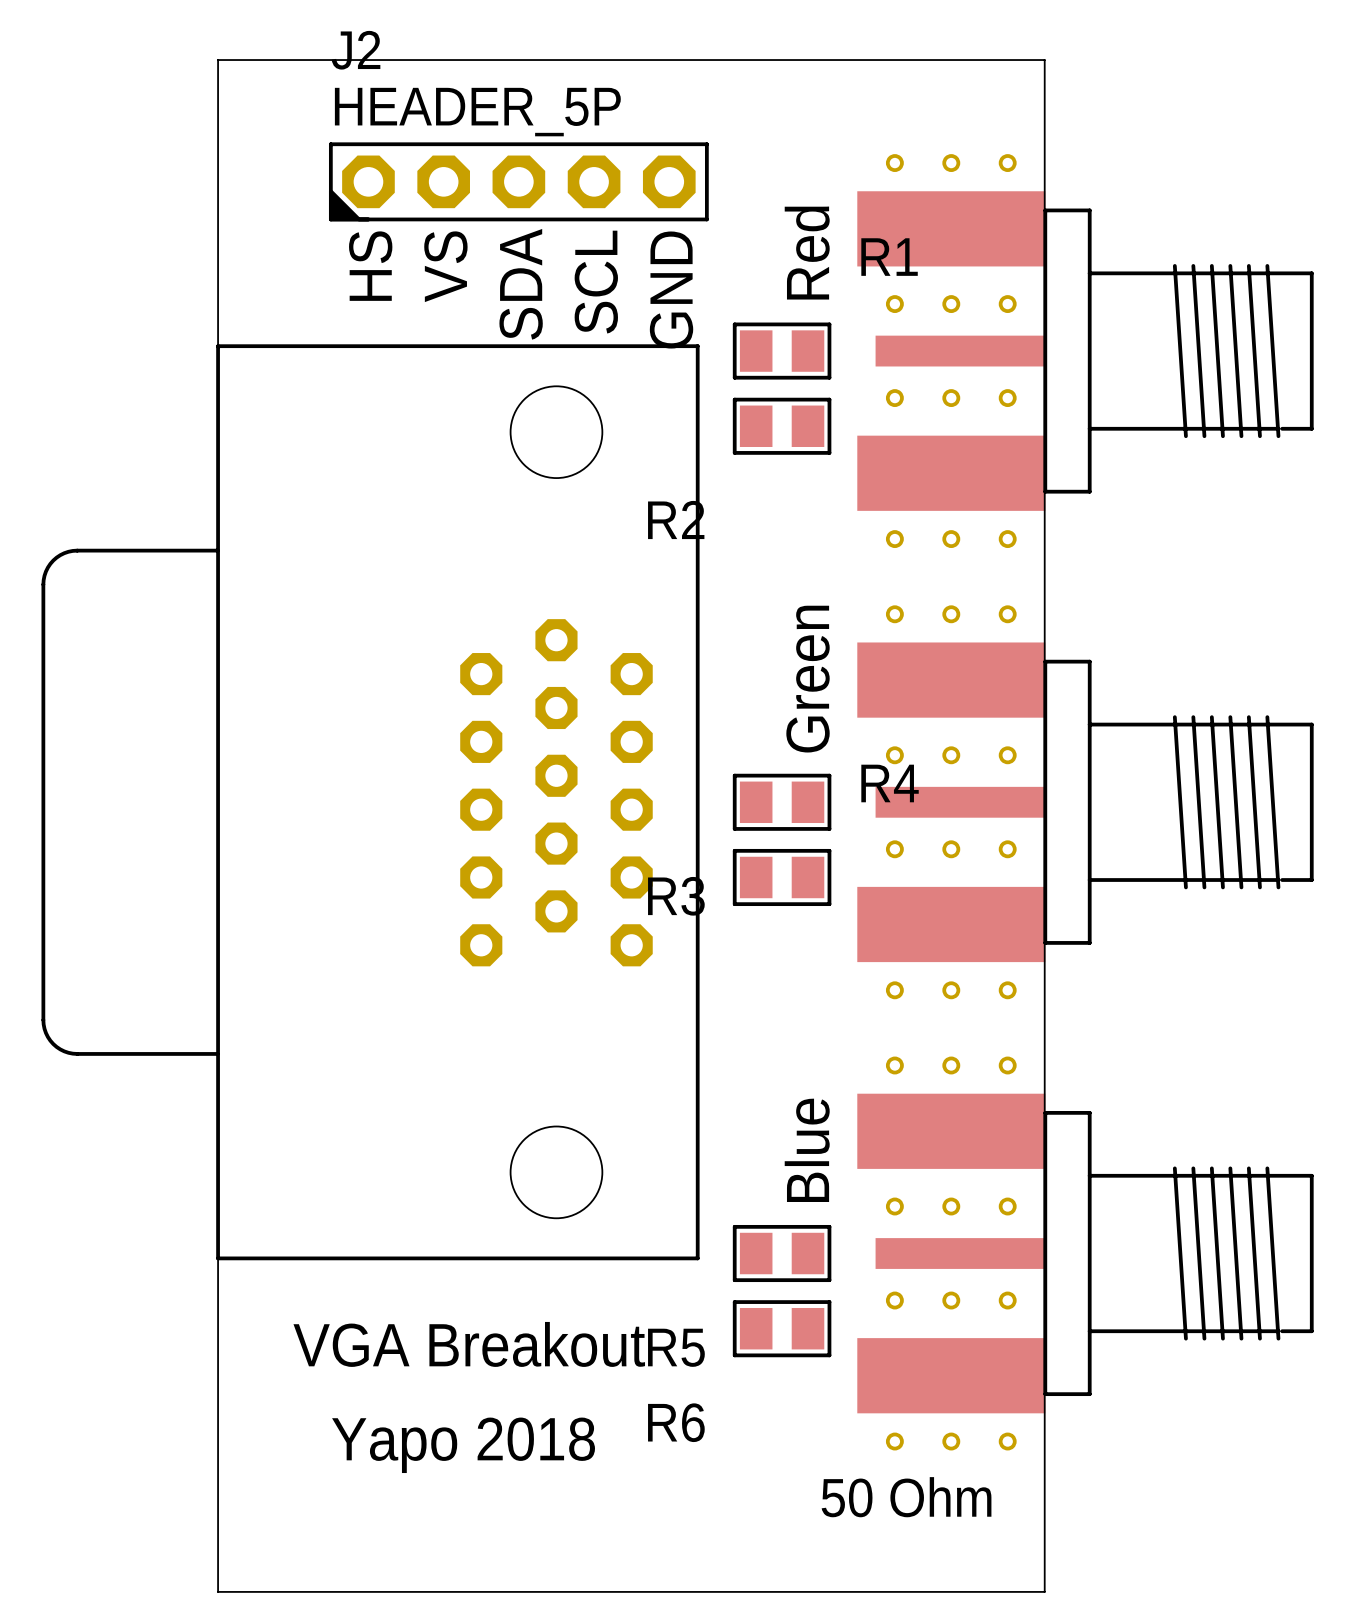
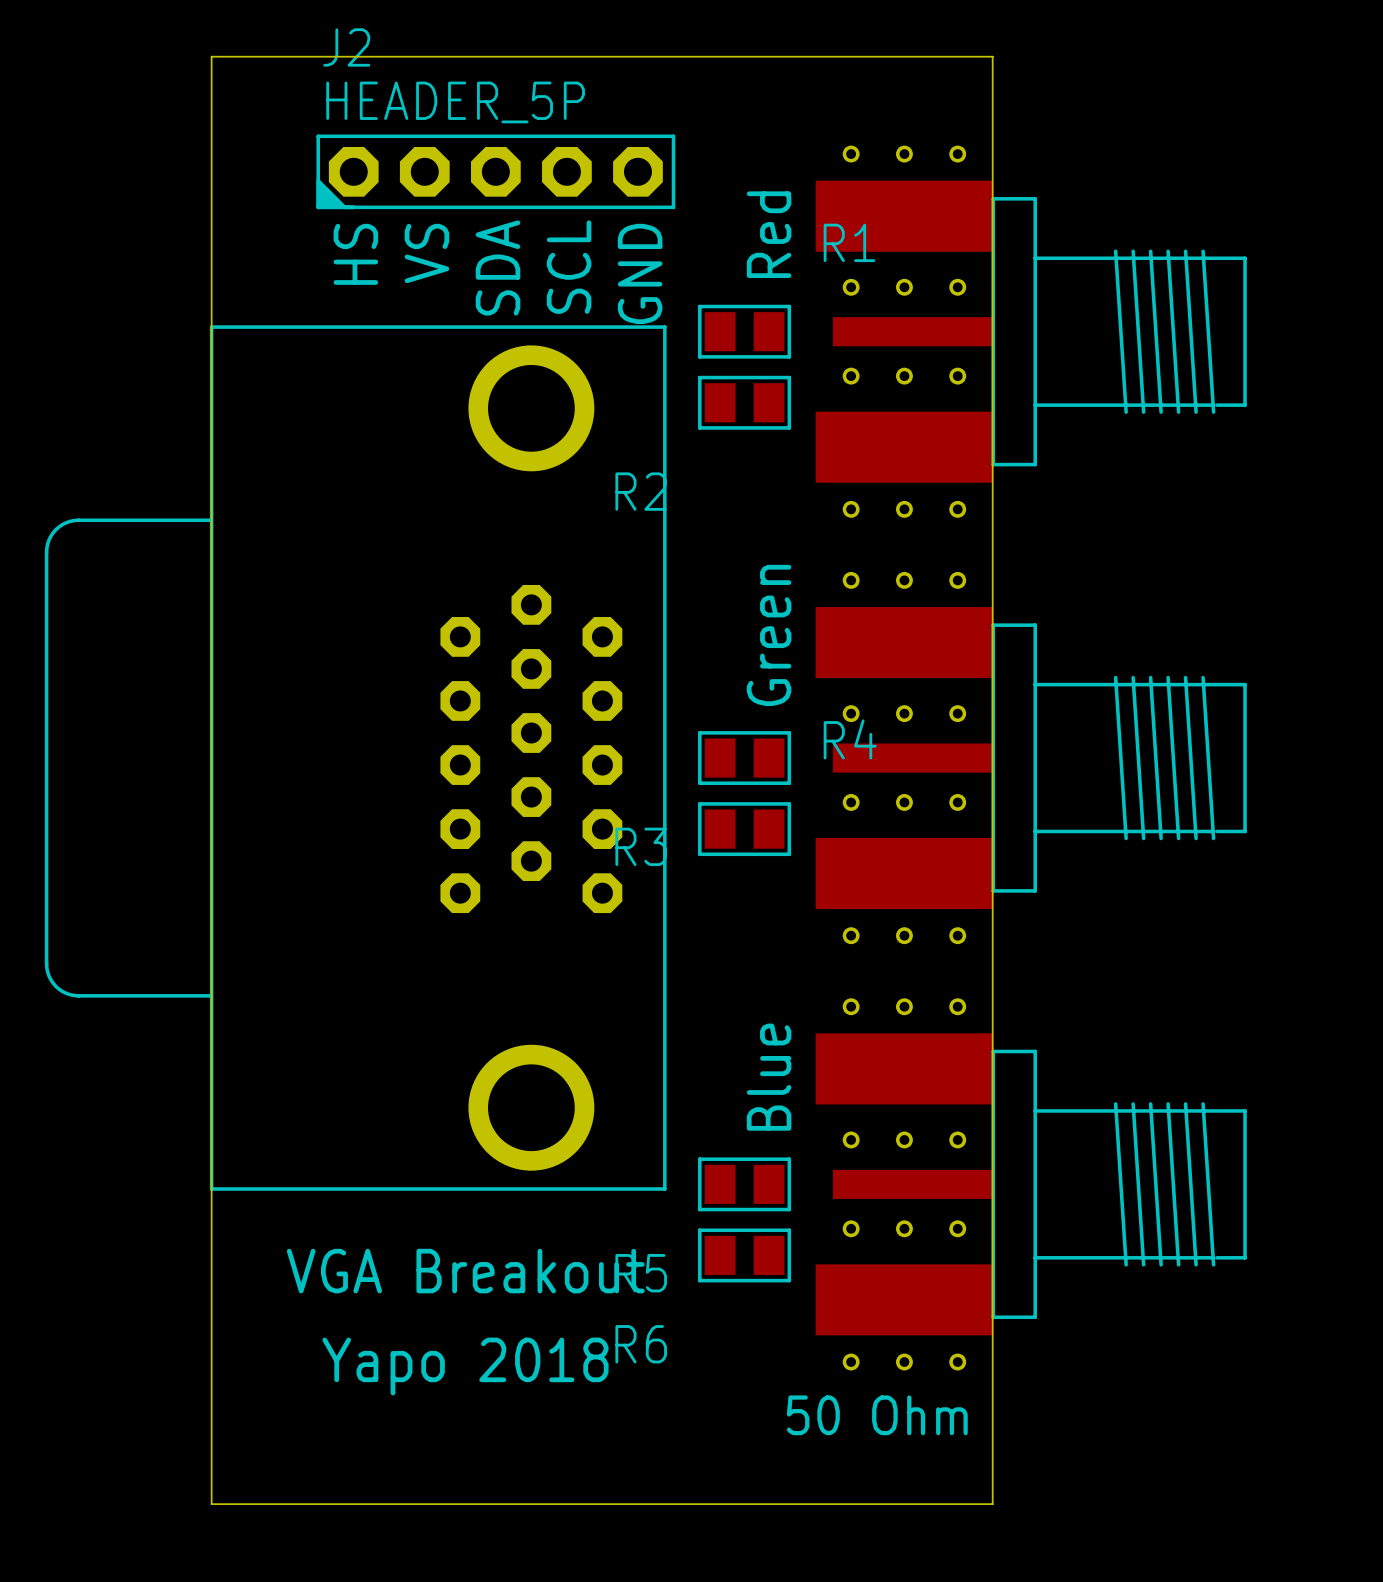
part footprint: [41, 344, 700, 1261] -> [44, 325, 667, 1191]

